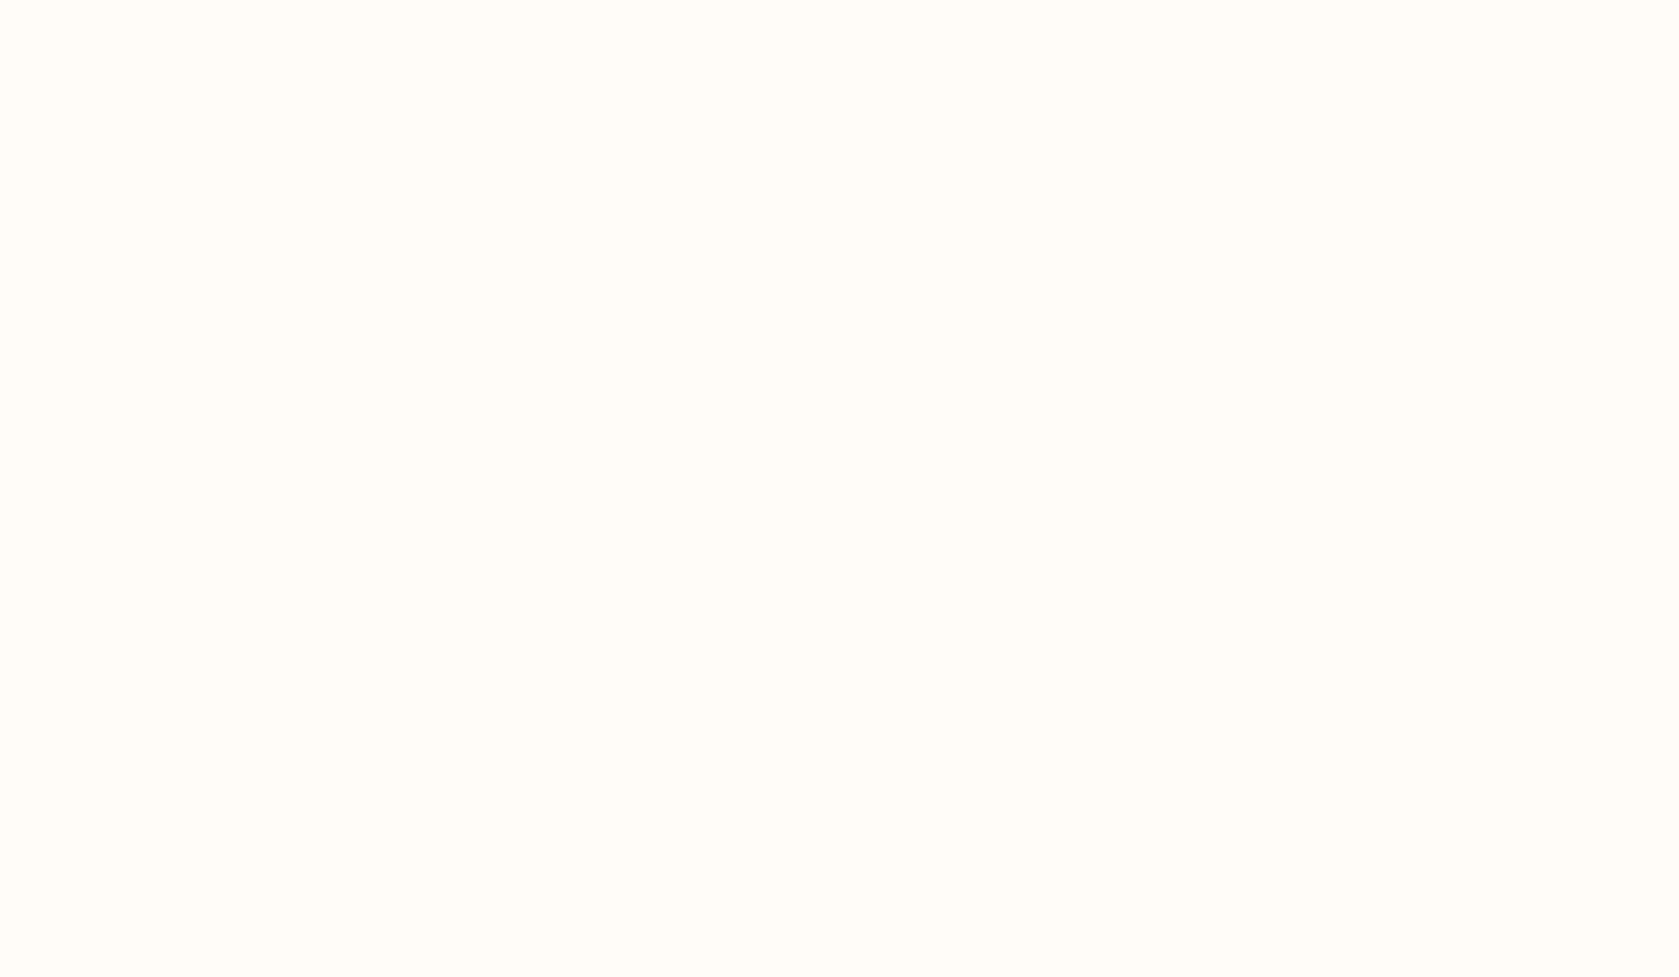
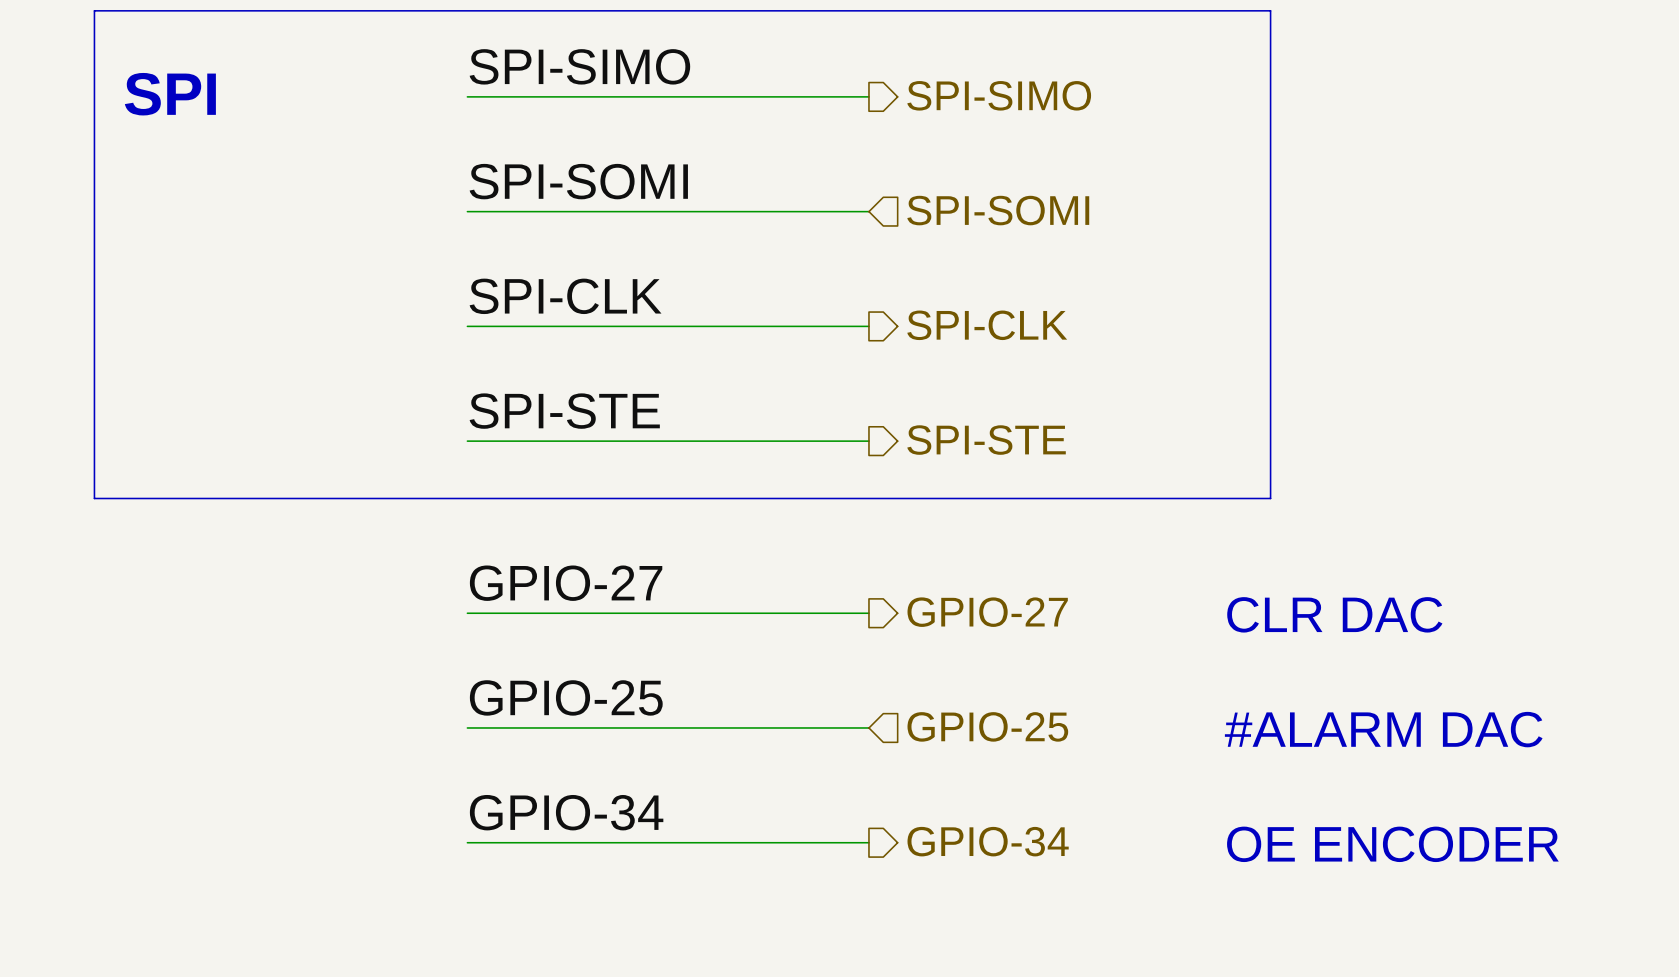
line: none -> (94, 10) (94, 498) (1270, 498) (1270, 10) (94, 10)
label: none -> SPI-SIMO (579, 66)
text: none -> SPI (170, 94)
hierarchical label: none -> SPI-SIMO (999, 95)
wire: none -> (467, 96) (868, 96)
label: none -> SPI-SOMI (578, 181)
hierarchical label: none -> SPI-SOMI (998, 210)
wire: none -> (467, 211) (868, 211)
label: none -> SPI-CLK (565, 296)
hierarchical label: none -> SPI-CLK (987, 325)
wire: none -> (467, 326) (868, 326)
label: none -> SPI-STE (564, 411)
hierarchical label: none -> SPI-STE (986, 440)
wire: none -> (467, 441) (868, 441)
label: none -> GPIO-27 (566, 583)
hierarchical label: none -> GPIO-27 (987, 612)
wire: none -> (467, 613) (868, 613)
text: none -> CLR DAC (1334, 614)
label: none -> GPIO-25 (566, 697)
hierarchical label: none -> GPIO-25 (987, 726)
wire: none -> (467, 727) (868, 727)
text: none -> #ALARM DAC (1383, 729)
label: none -> GPIO-34 (566, 812)
hierarchical label: none -> GPIO-34 (988, 841)
wire: none -> (467, 842) (868, 842)
text: none -> OE ENCODER (1392, 844)

